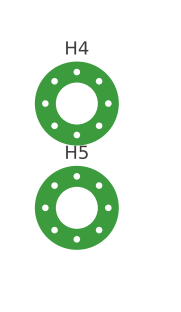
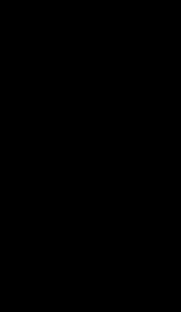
H4: (76, 103) -> none
H5: (76, 207) -> none

